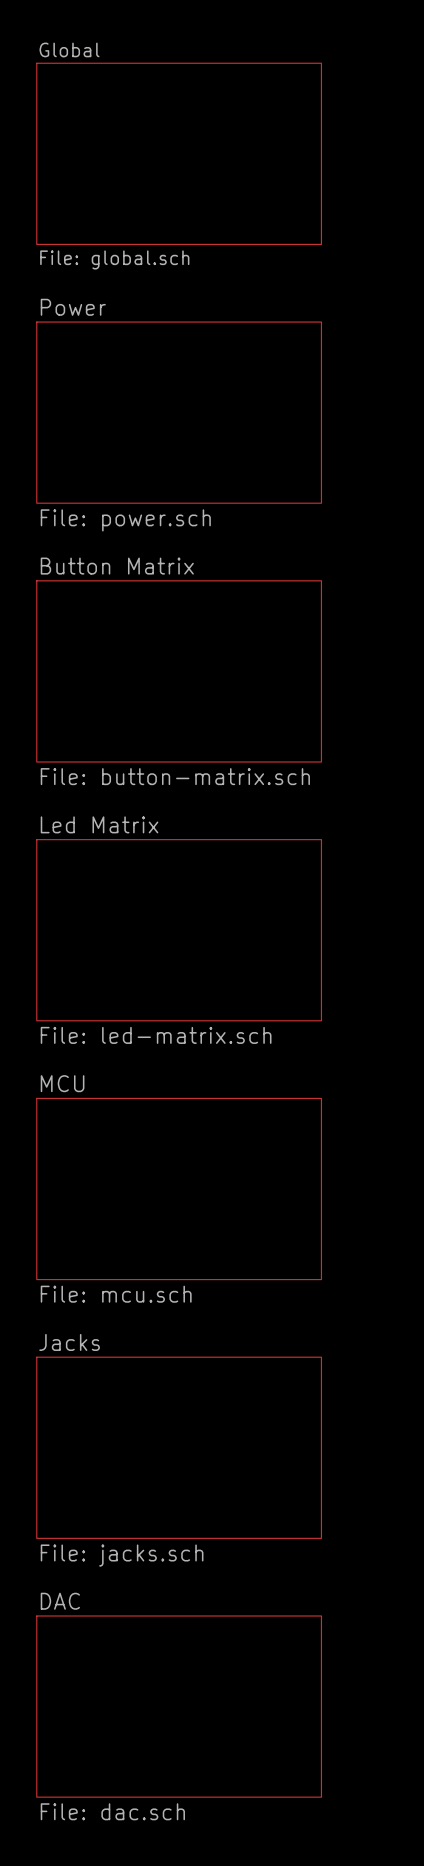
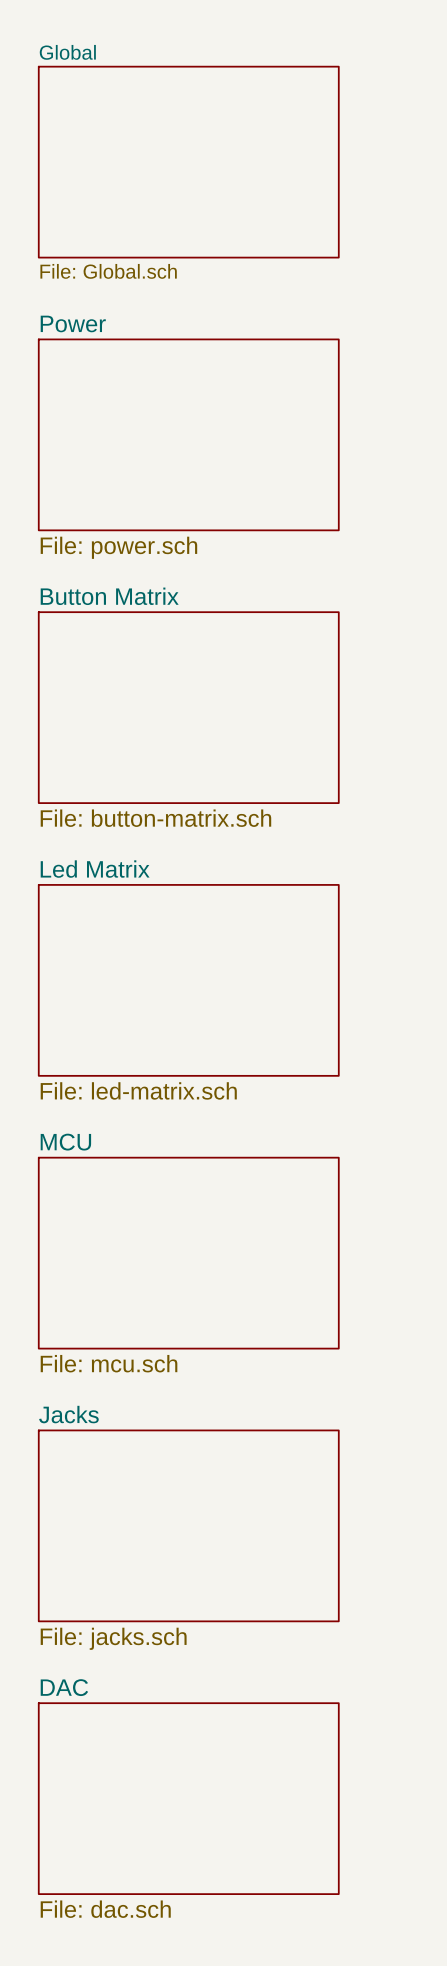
sheet Global value: File: global.sch (114, 259) -> File: Global.sch (108, 271)

